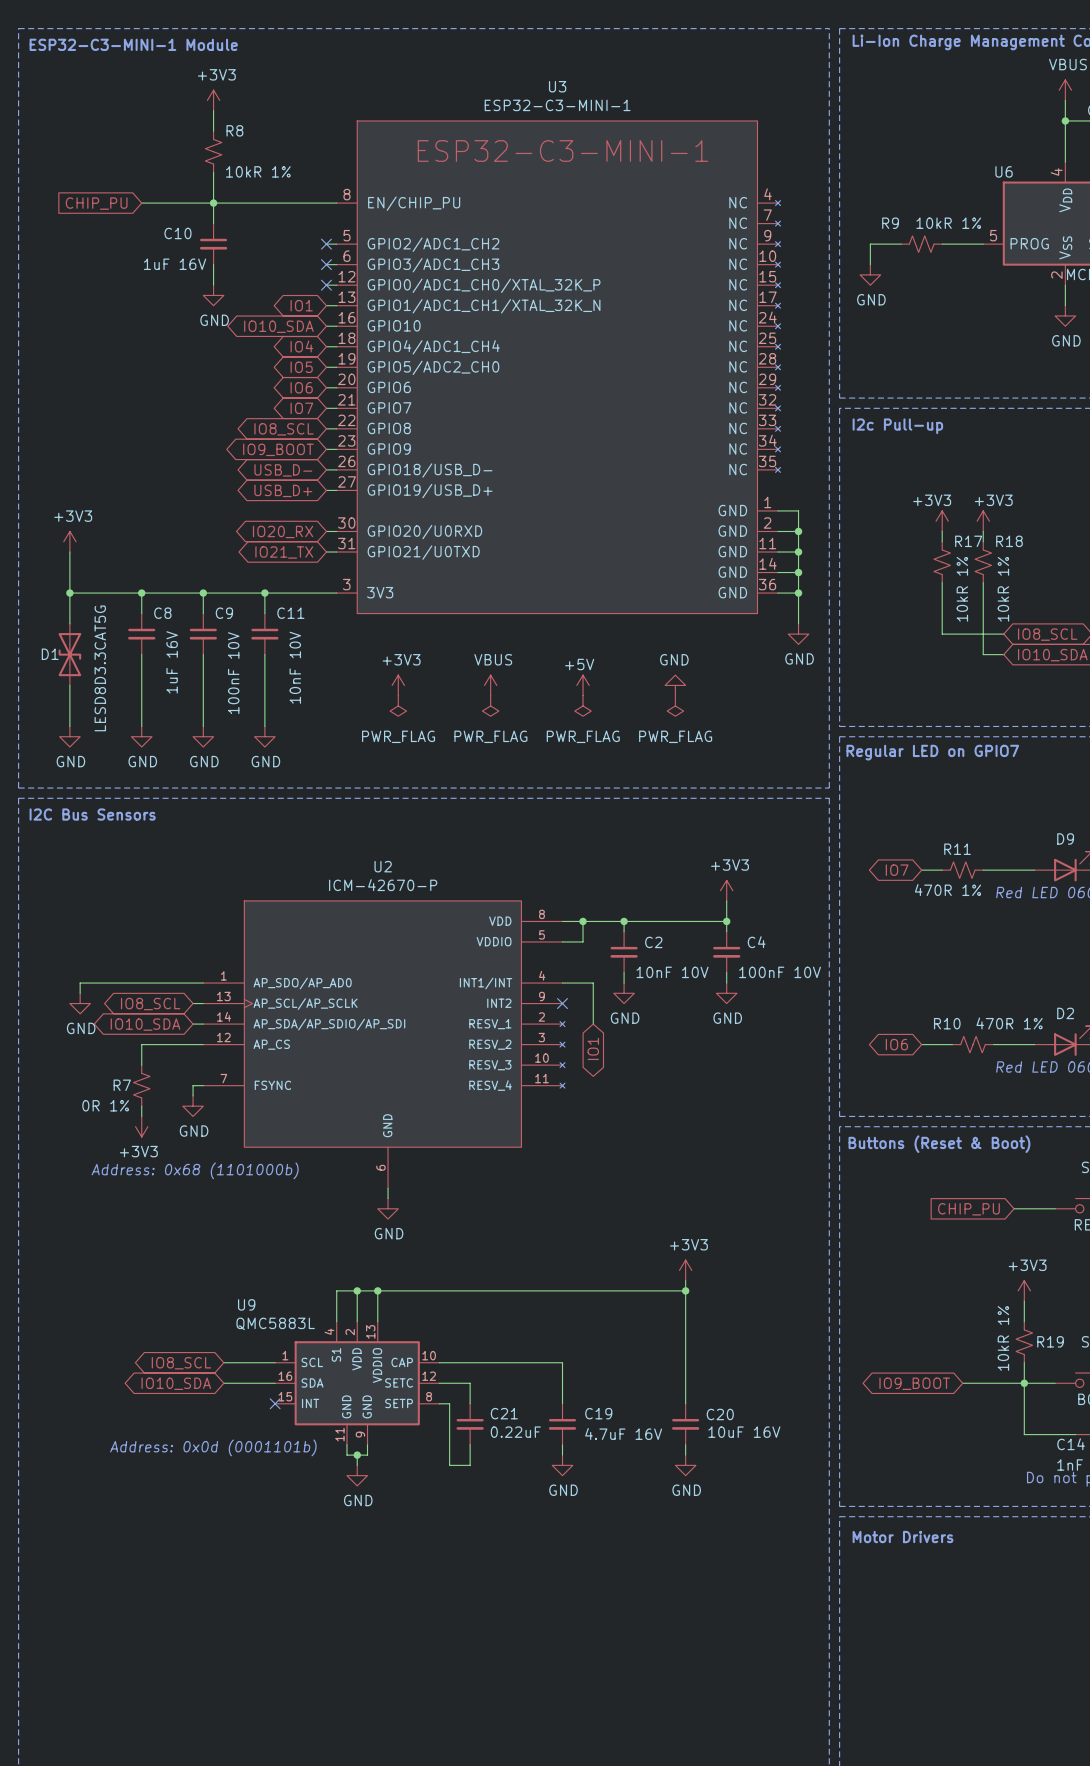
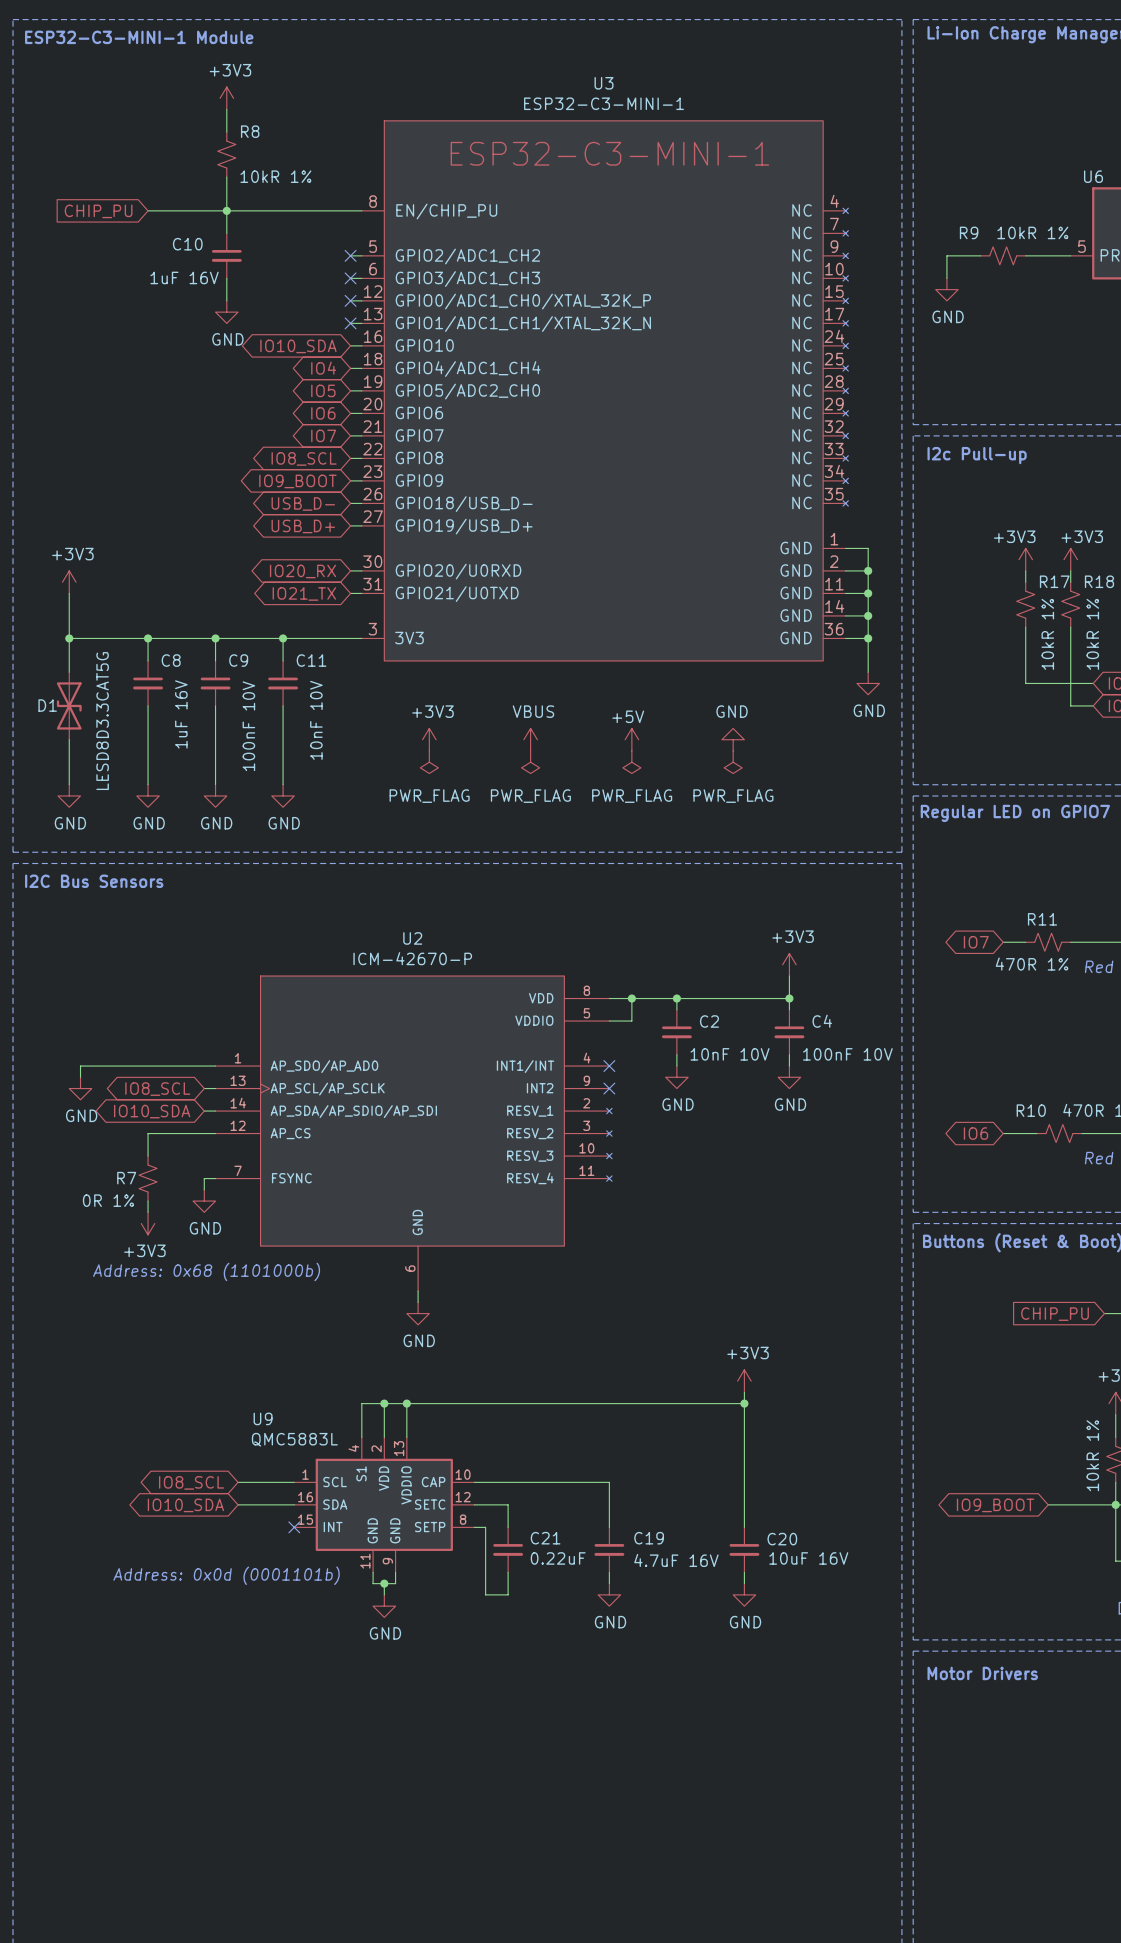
global label: IO1 (301, 305) -> none
no-connect mark: none -> (350, 323)
wire: (562, 983) (593, 983) (593, 1024) -> none
no-connect mark: none -> (609, 1066)
global label: IO1 (593, 1048) -> none

